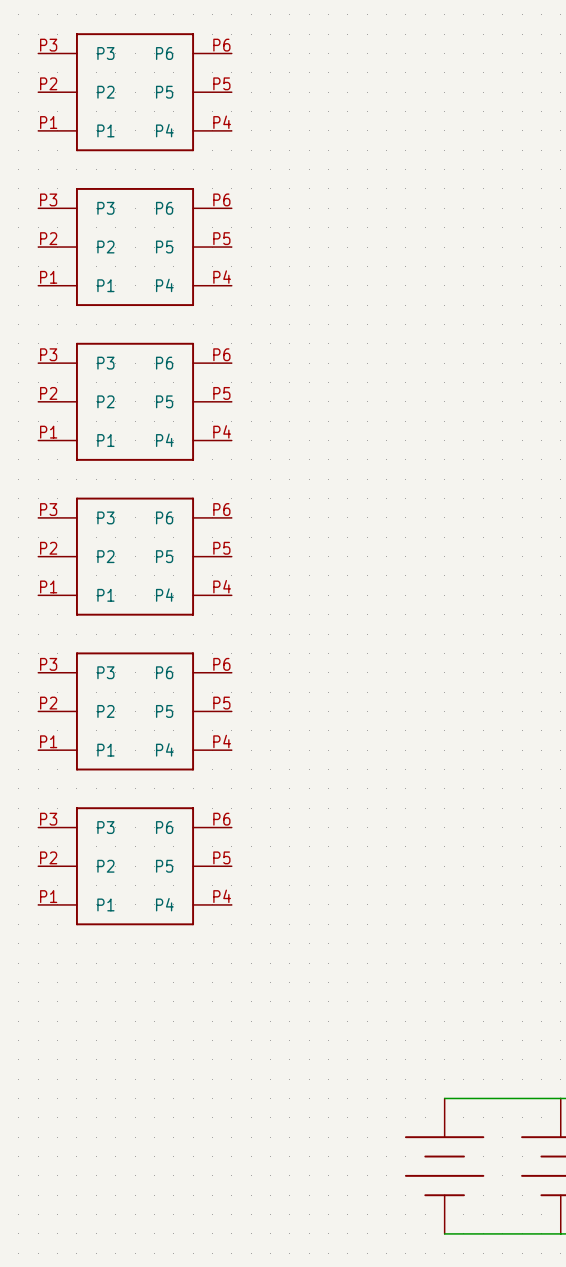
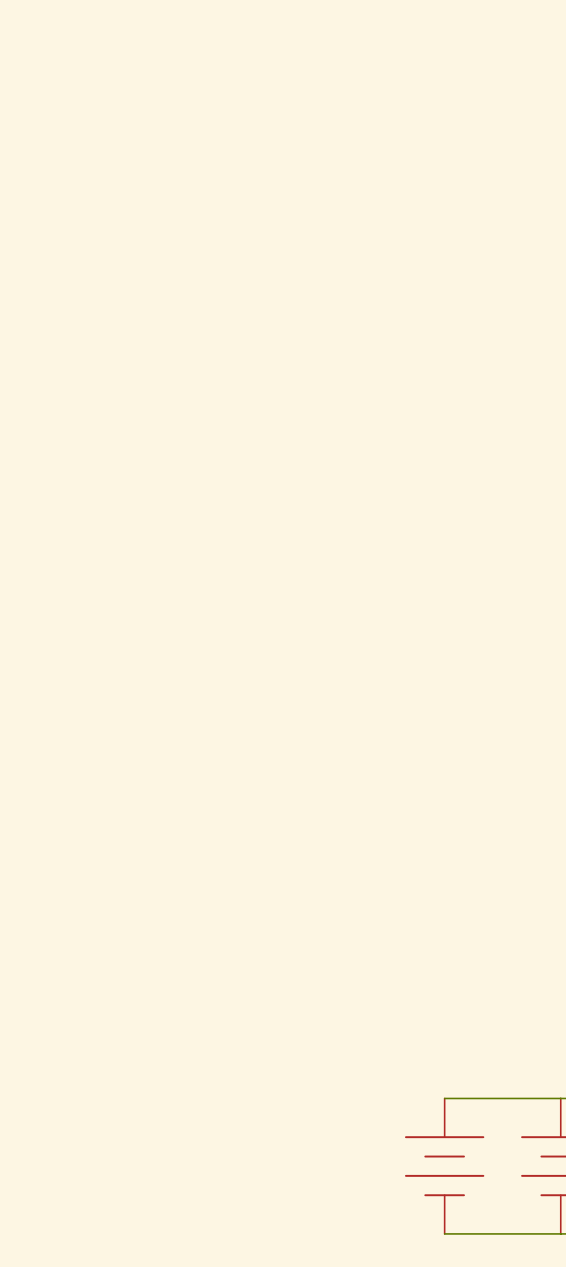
part: (135, 92) -> none
part: (135, 247) -> none
part: (135, 401) -> none
part: (135, 556) -> none
part: (135, 711) -> none
part: (135, 866) -> none

